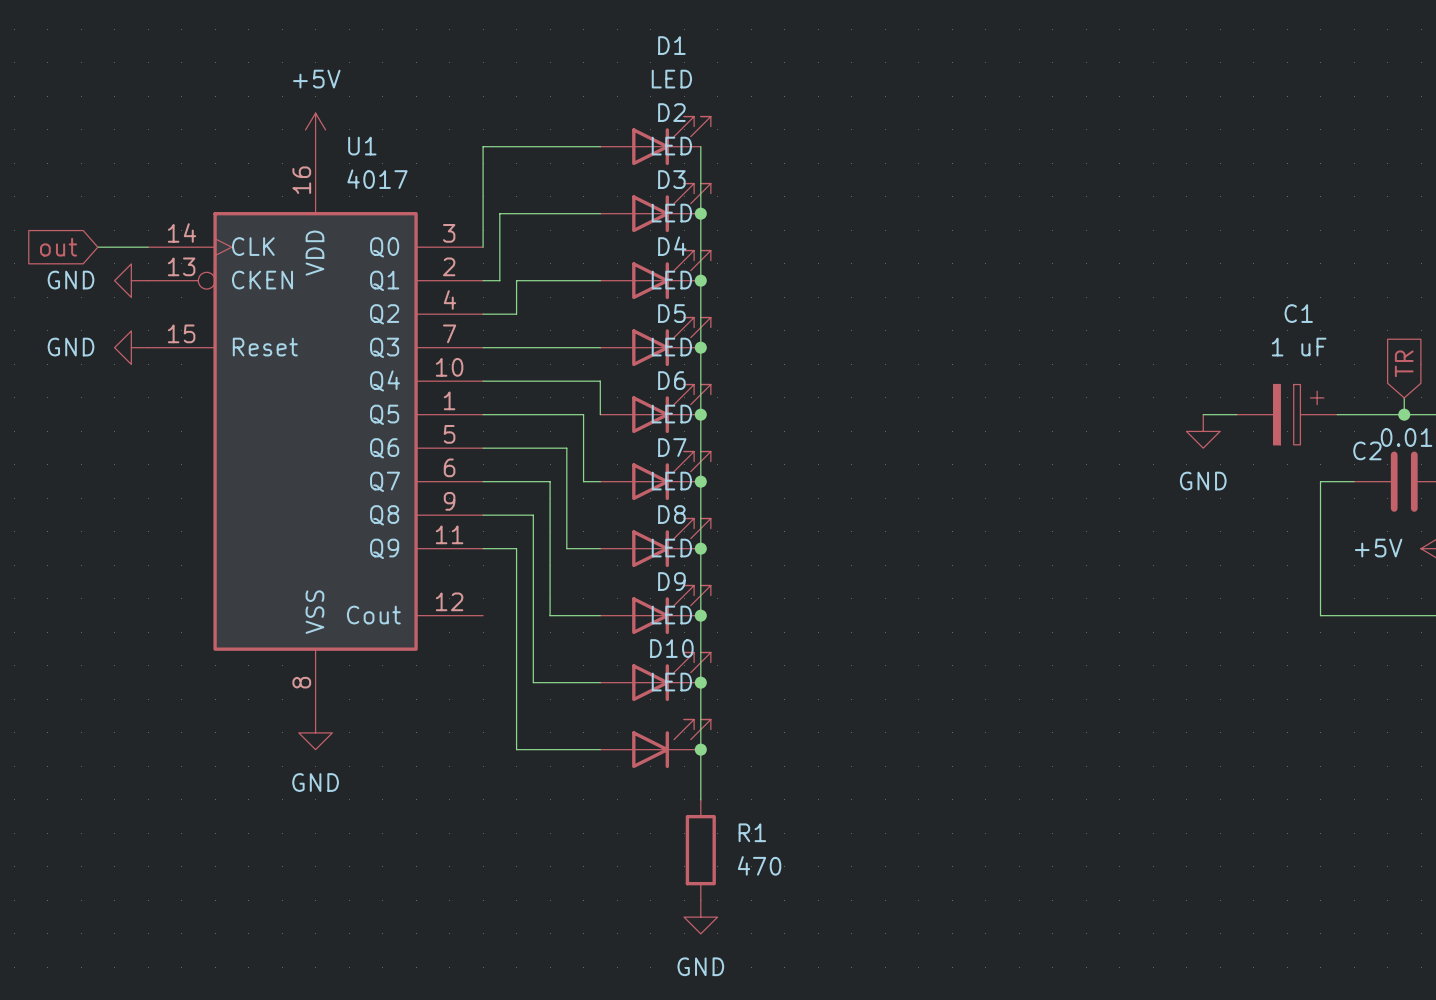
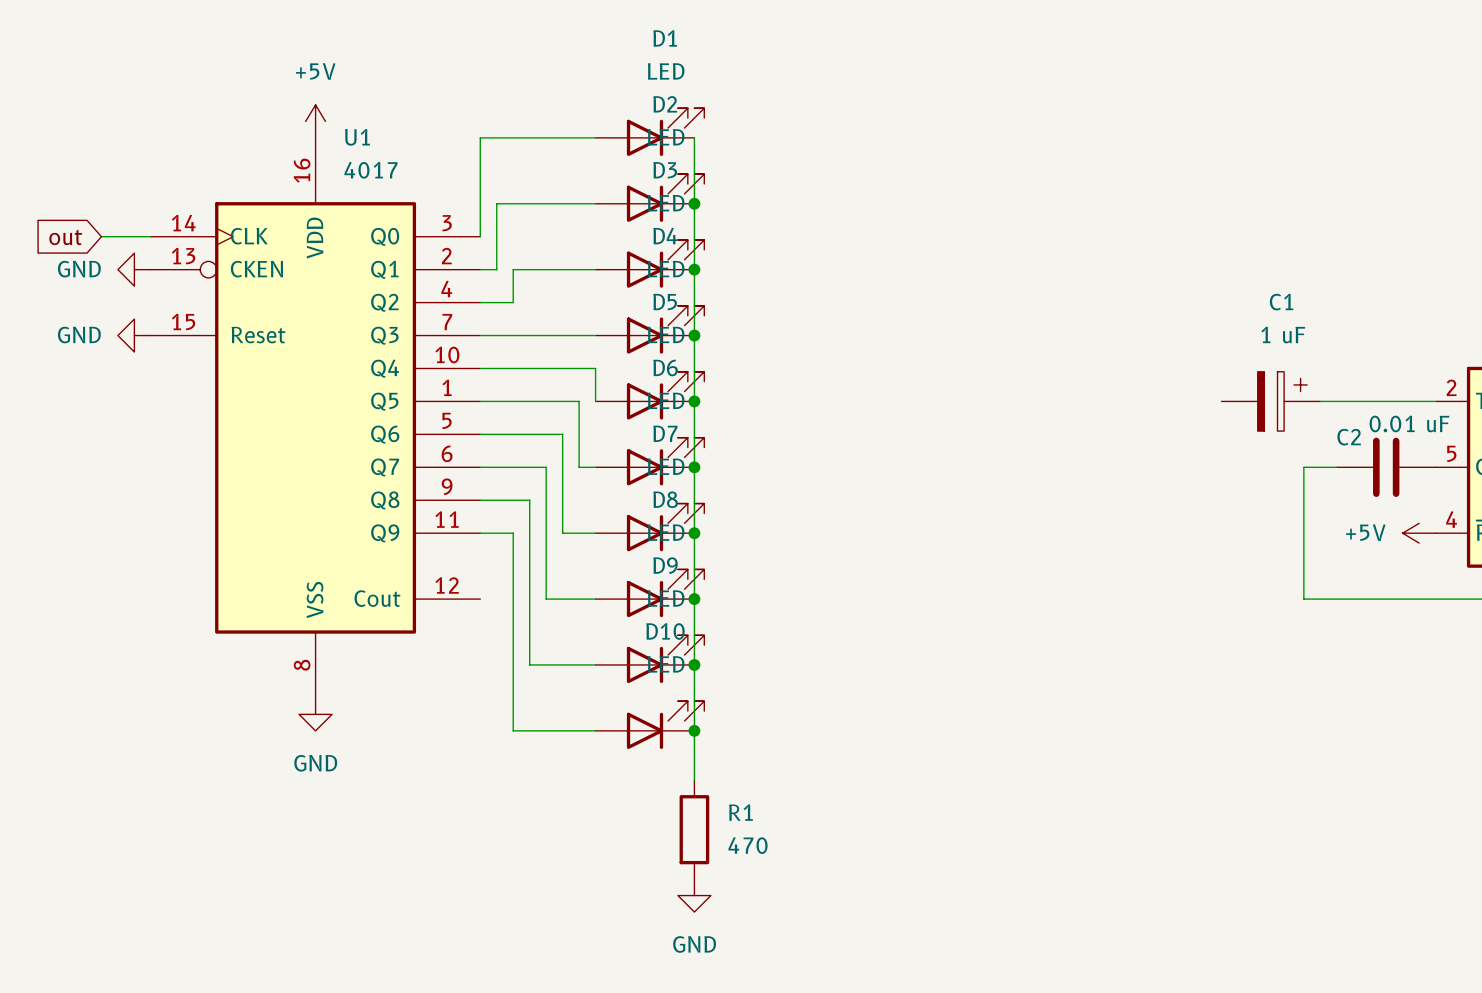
global label: TR (1404, 363) -> none
wire: (1404, 397) (1404, 414) -> none
wire: (1203, 414) (1236, 414) -> none
junction: (1404, 414) -> none
power symbol: GND (1203, 431) -> none

